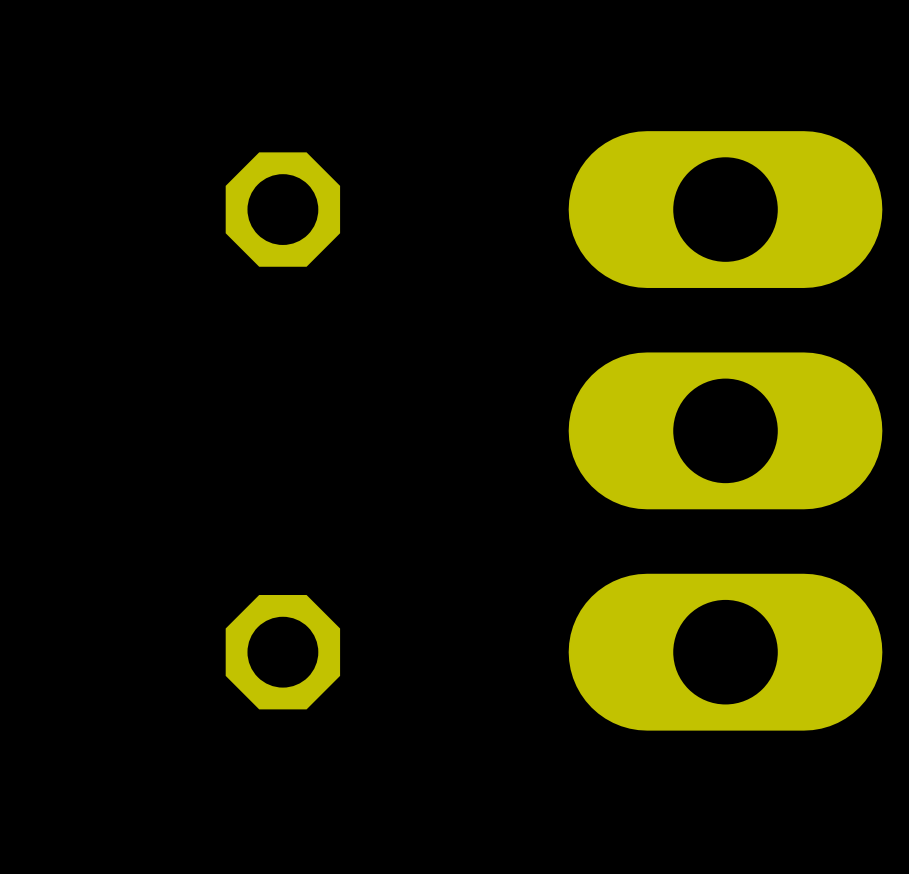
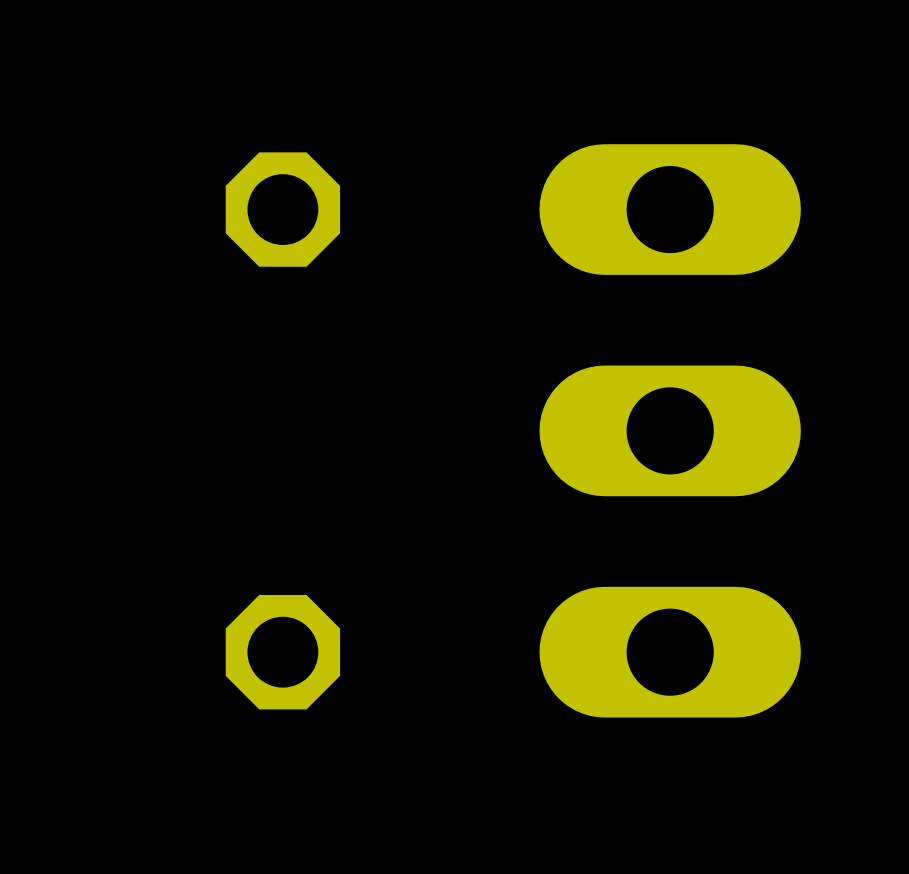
part footprint: [568, 131, 883, 731] -> [539, 144, 801, 718]

